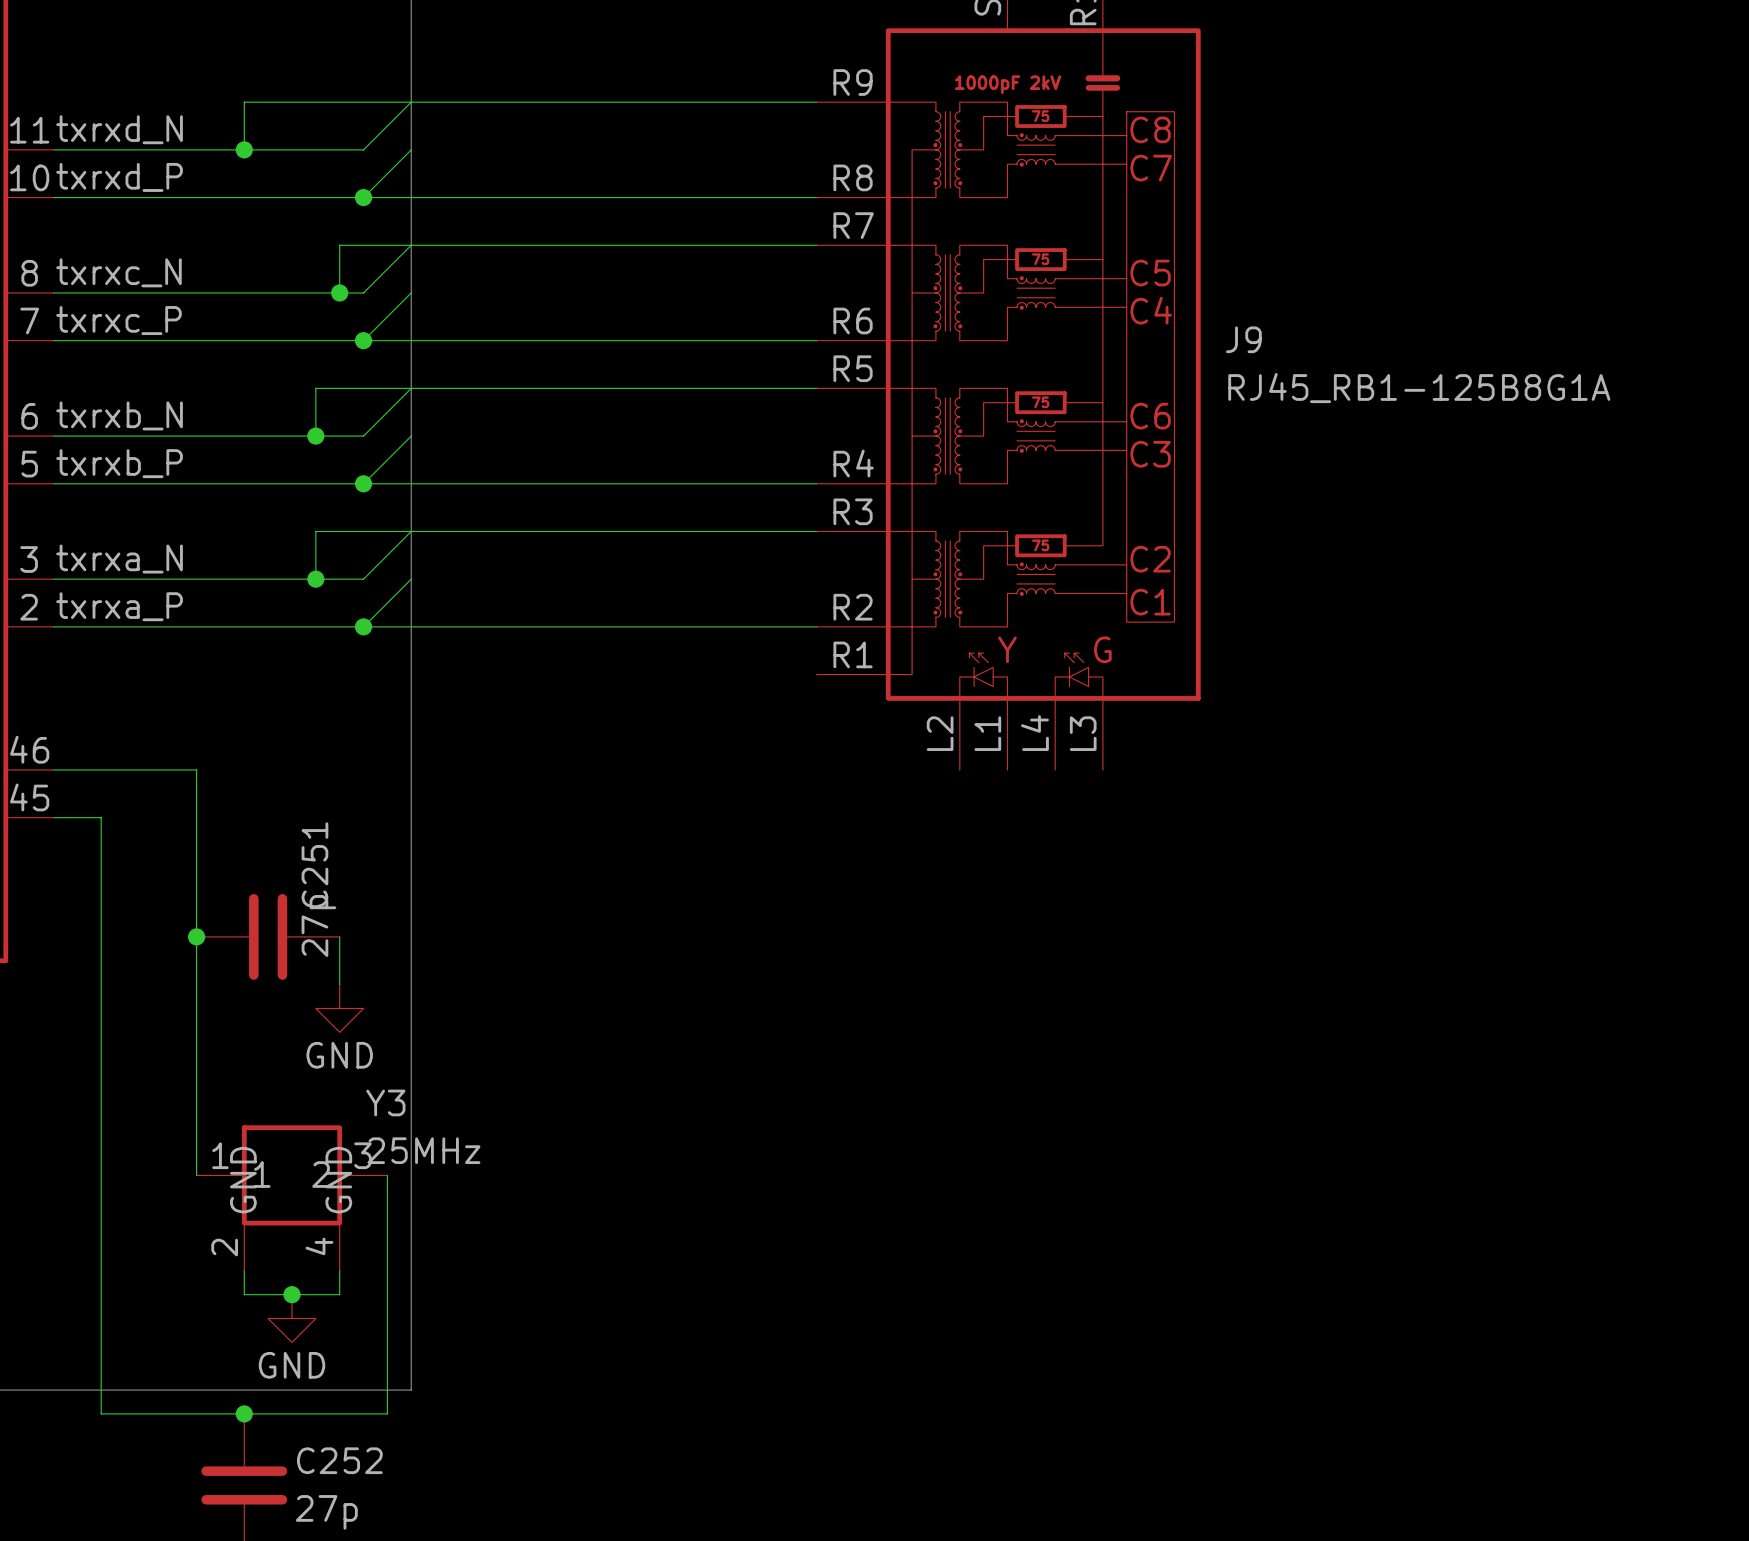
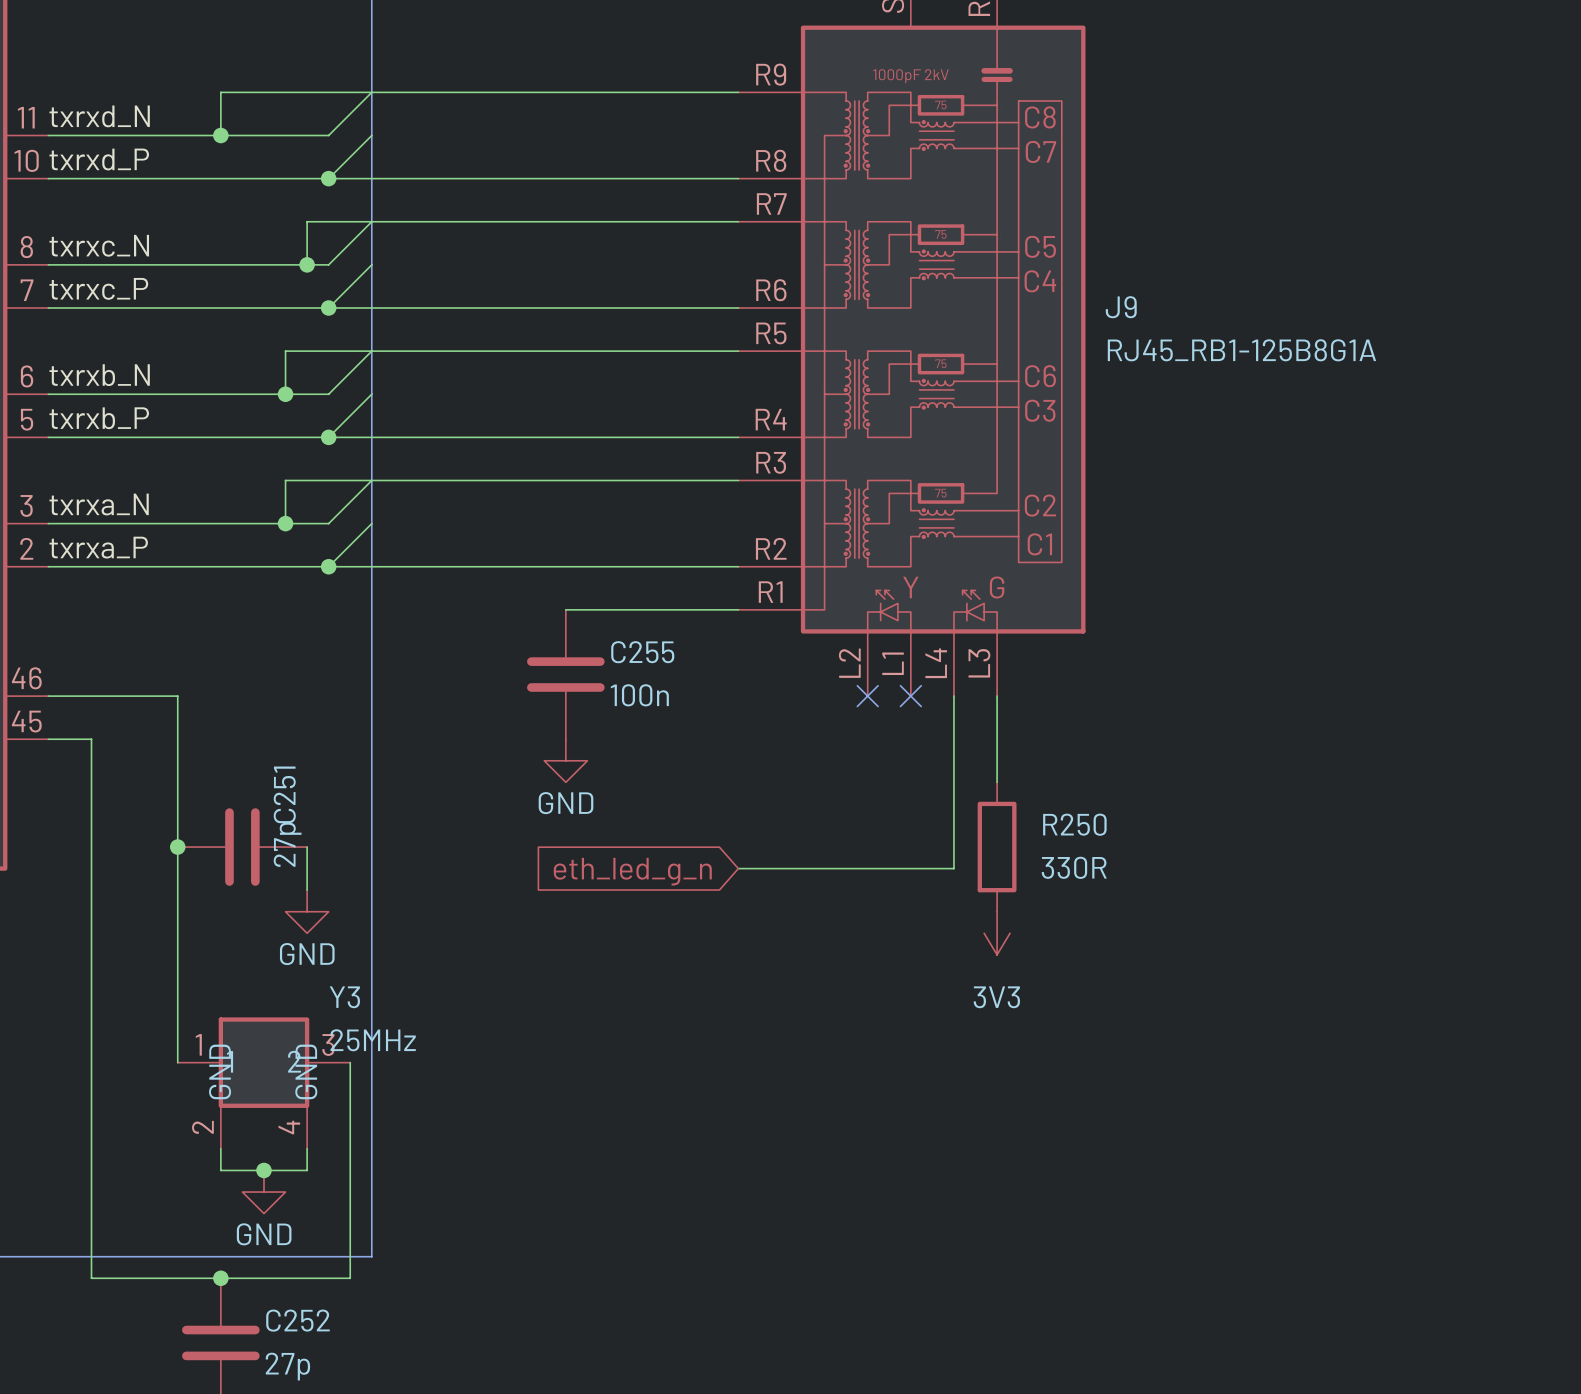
wire: none -> (565, 609) (738, 609)
C255: none -> 100n (565, 674)
no-connect mark: none -> (867, 696)
no-connect mark: none -> (910, 696)
wire: none -> (953, 696) (953, 868) (738, 868)
wire: none -> (997, 696) (997, 782)
power symbol: none -> GND (565, 760)
R250: none -> 330R (997, 847)
global label: none -> eth_led_g_n (632, 871)
power symbol: none -> 3V3 (997, 933)

